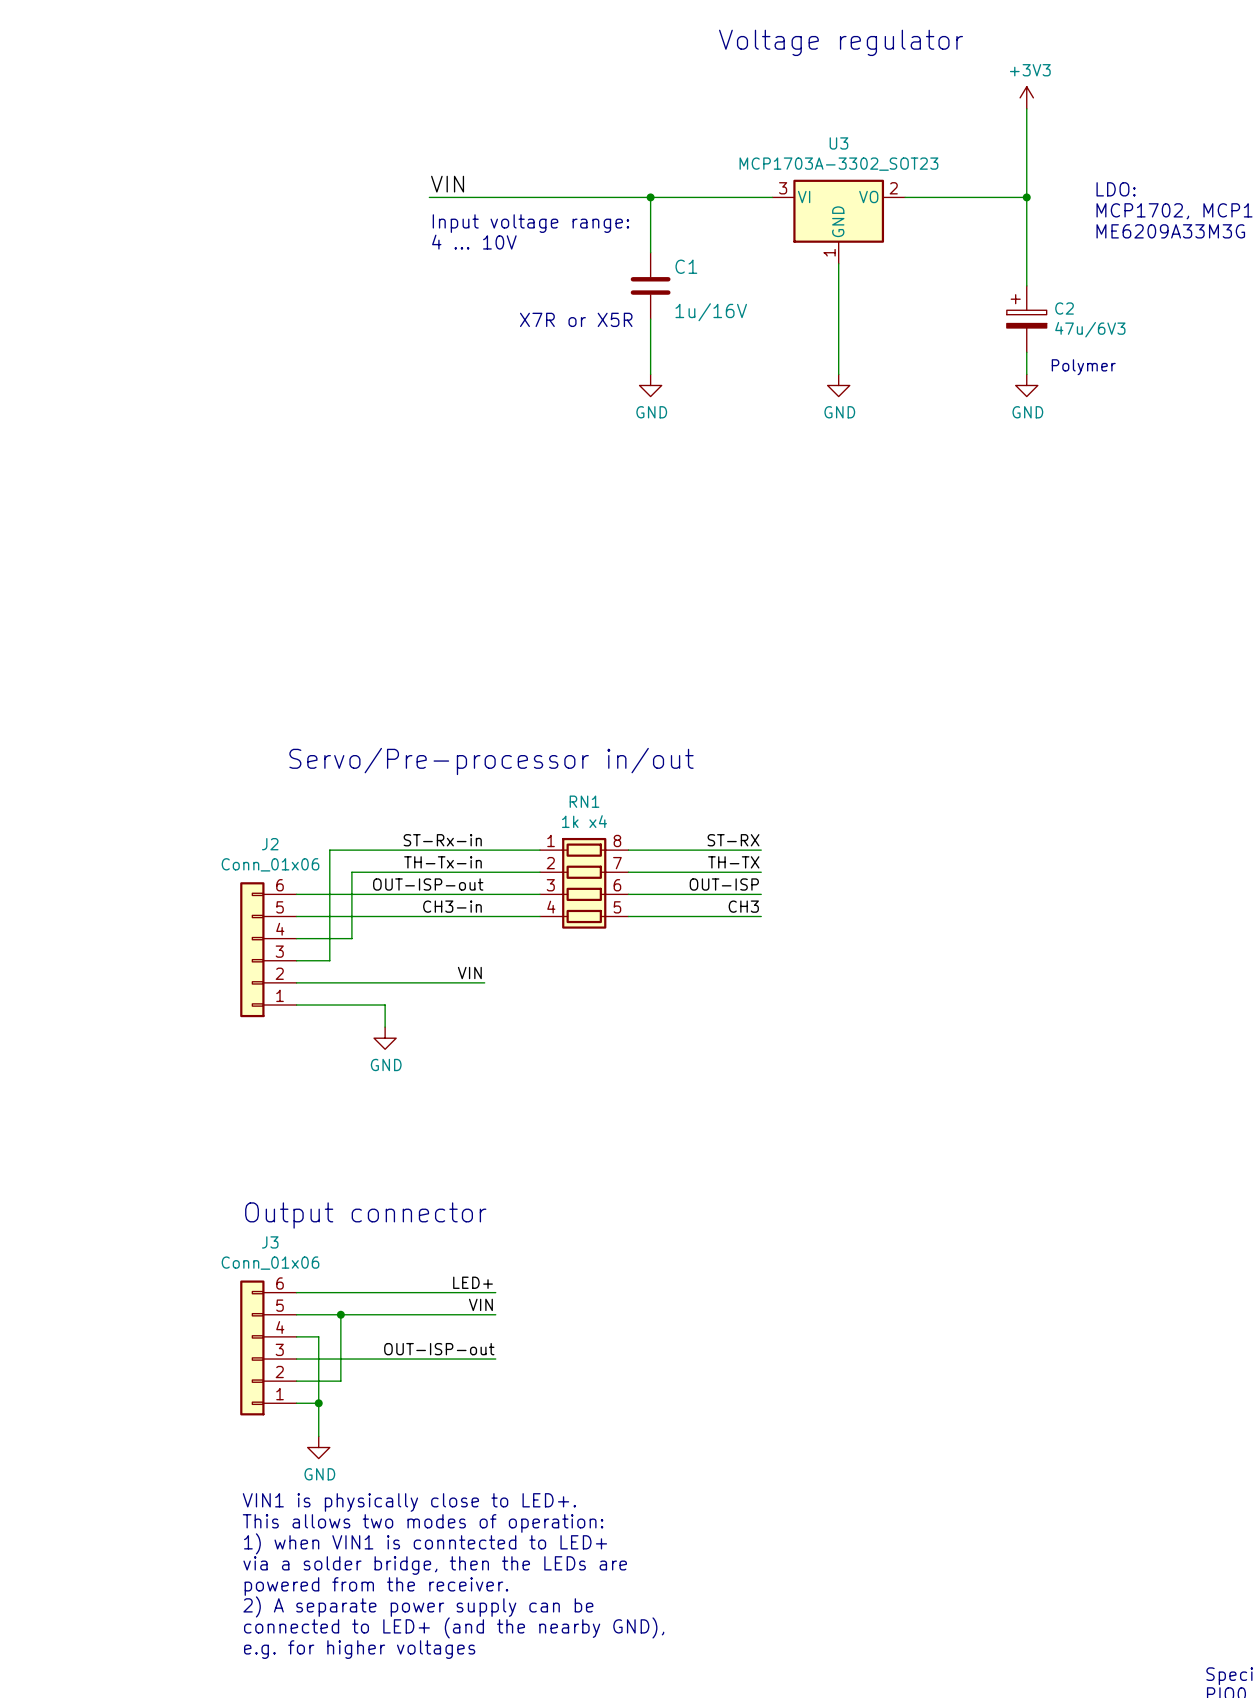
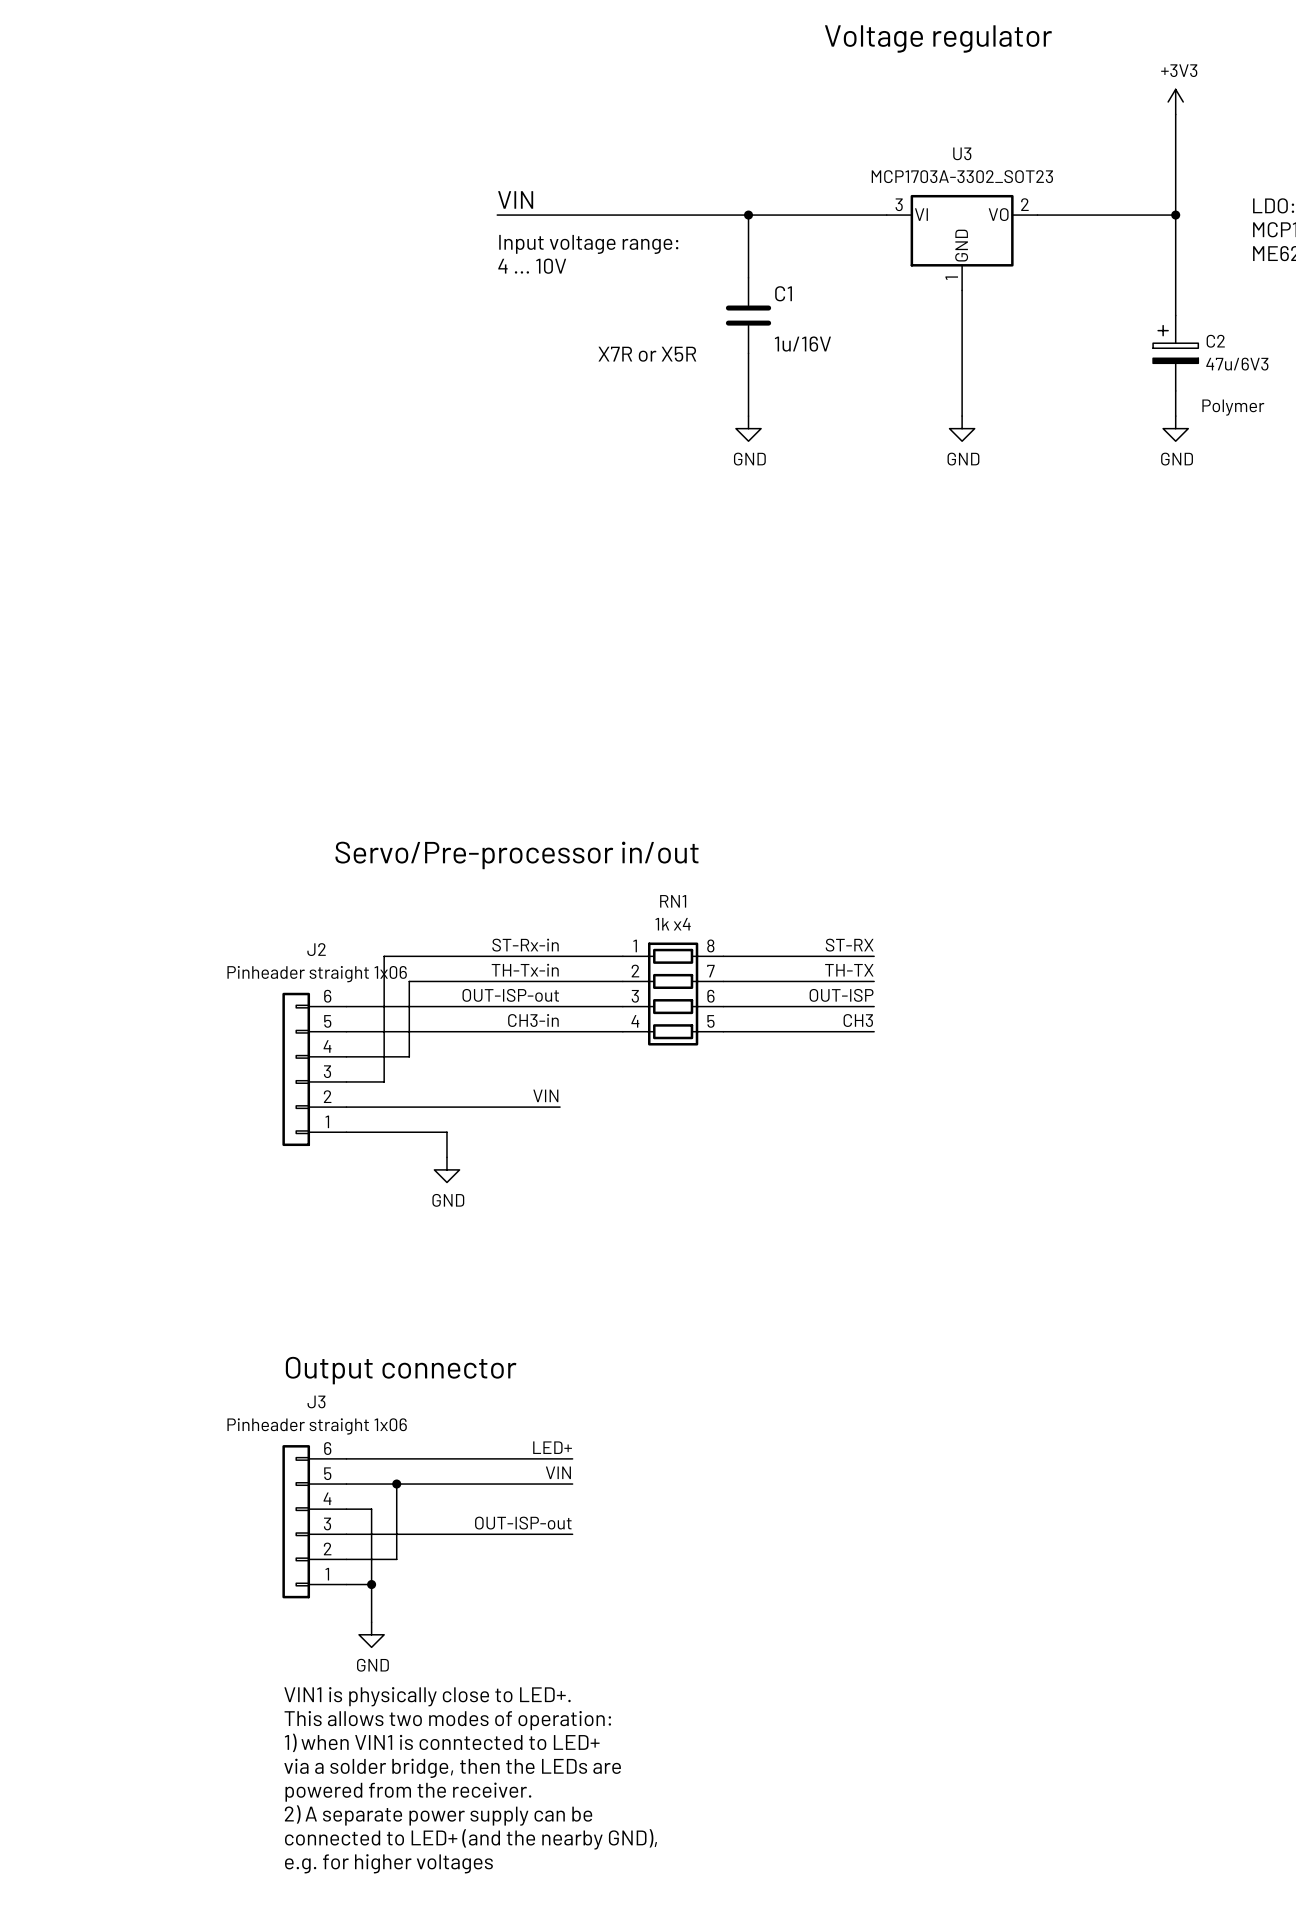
J2 value: Conn_01x06 (270, 864) -> Pinheader straight 1x06 (317, 974)
J3 value: Conn_01x06 (270, 1263) -> Pinheader straight 1x06 (317, 1426)

